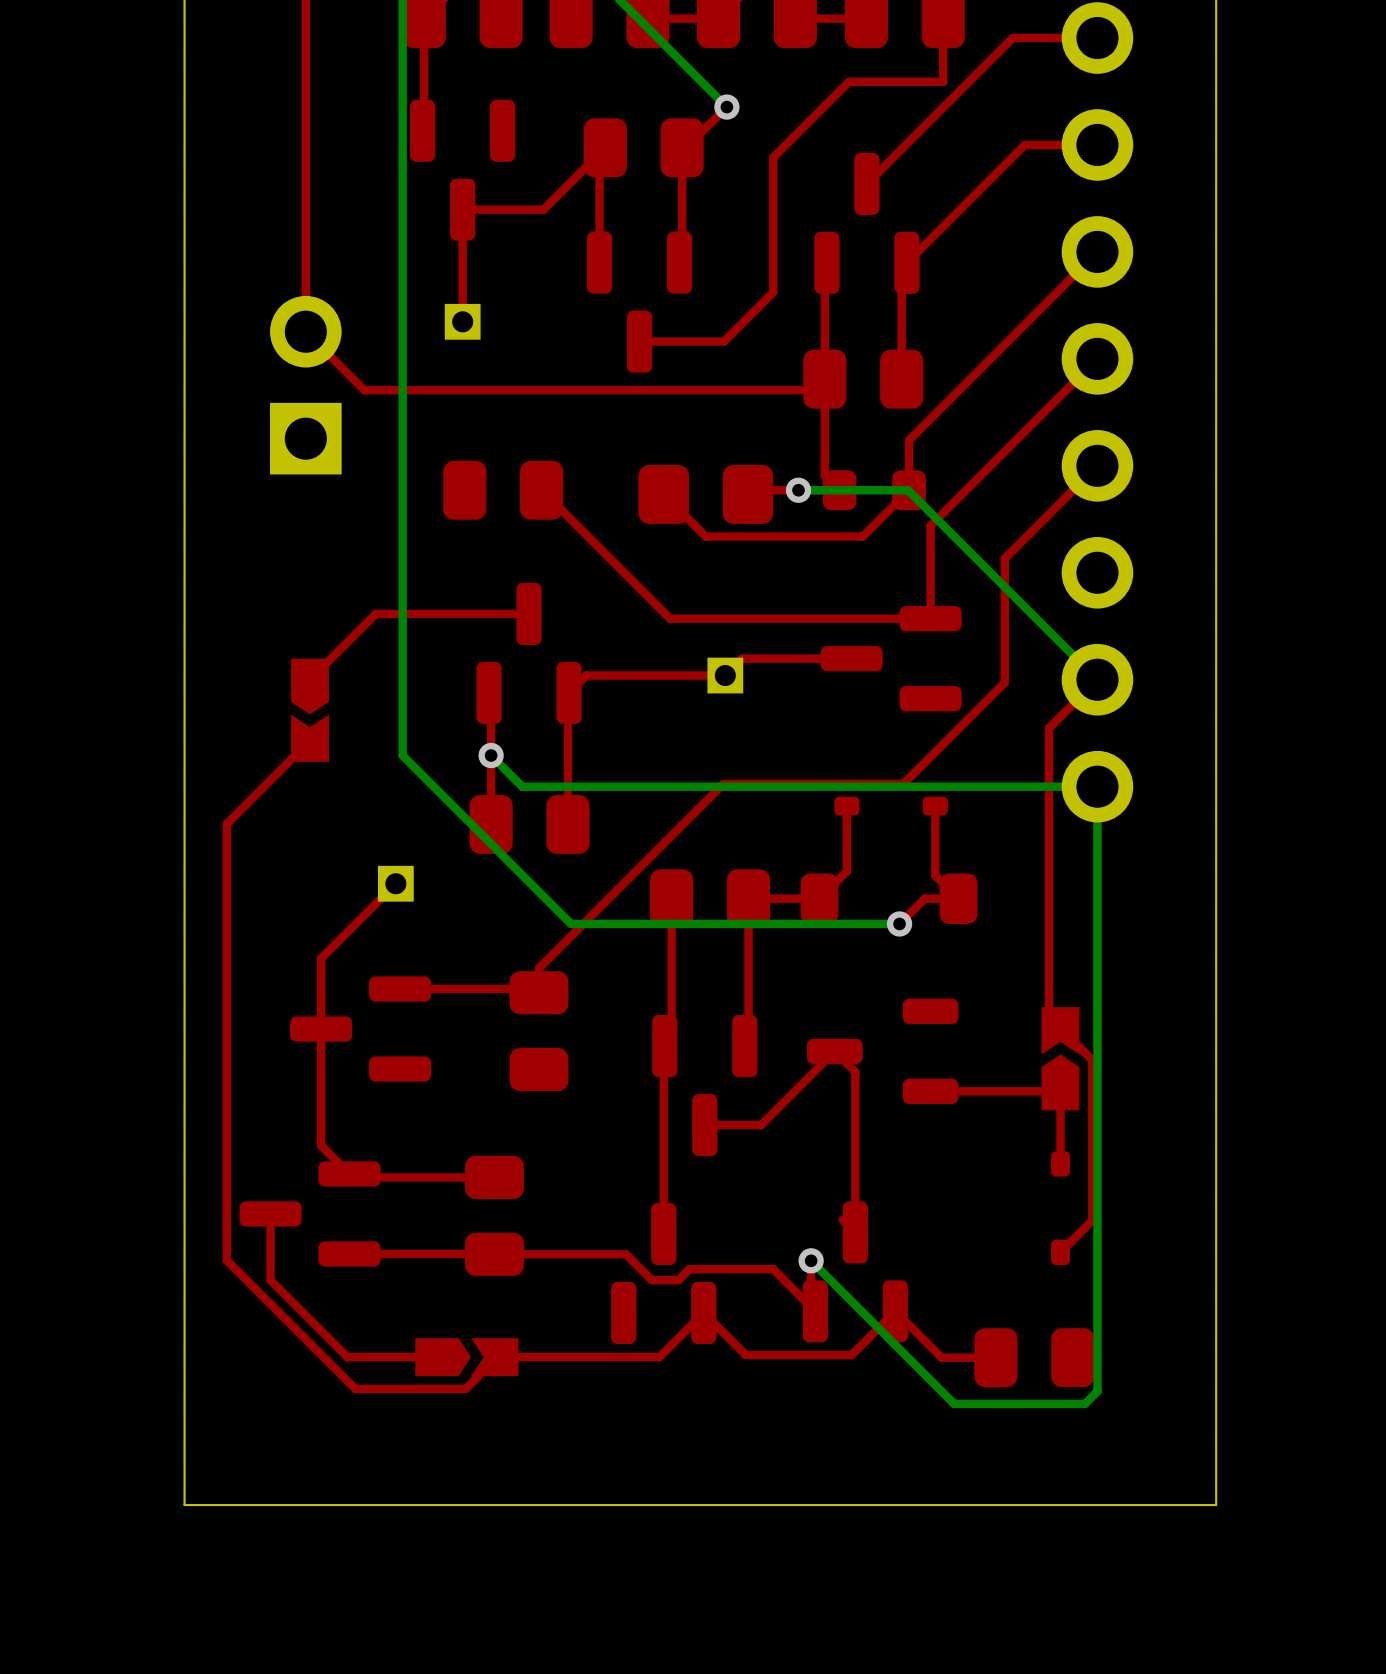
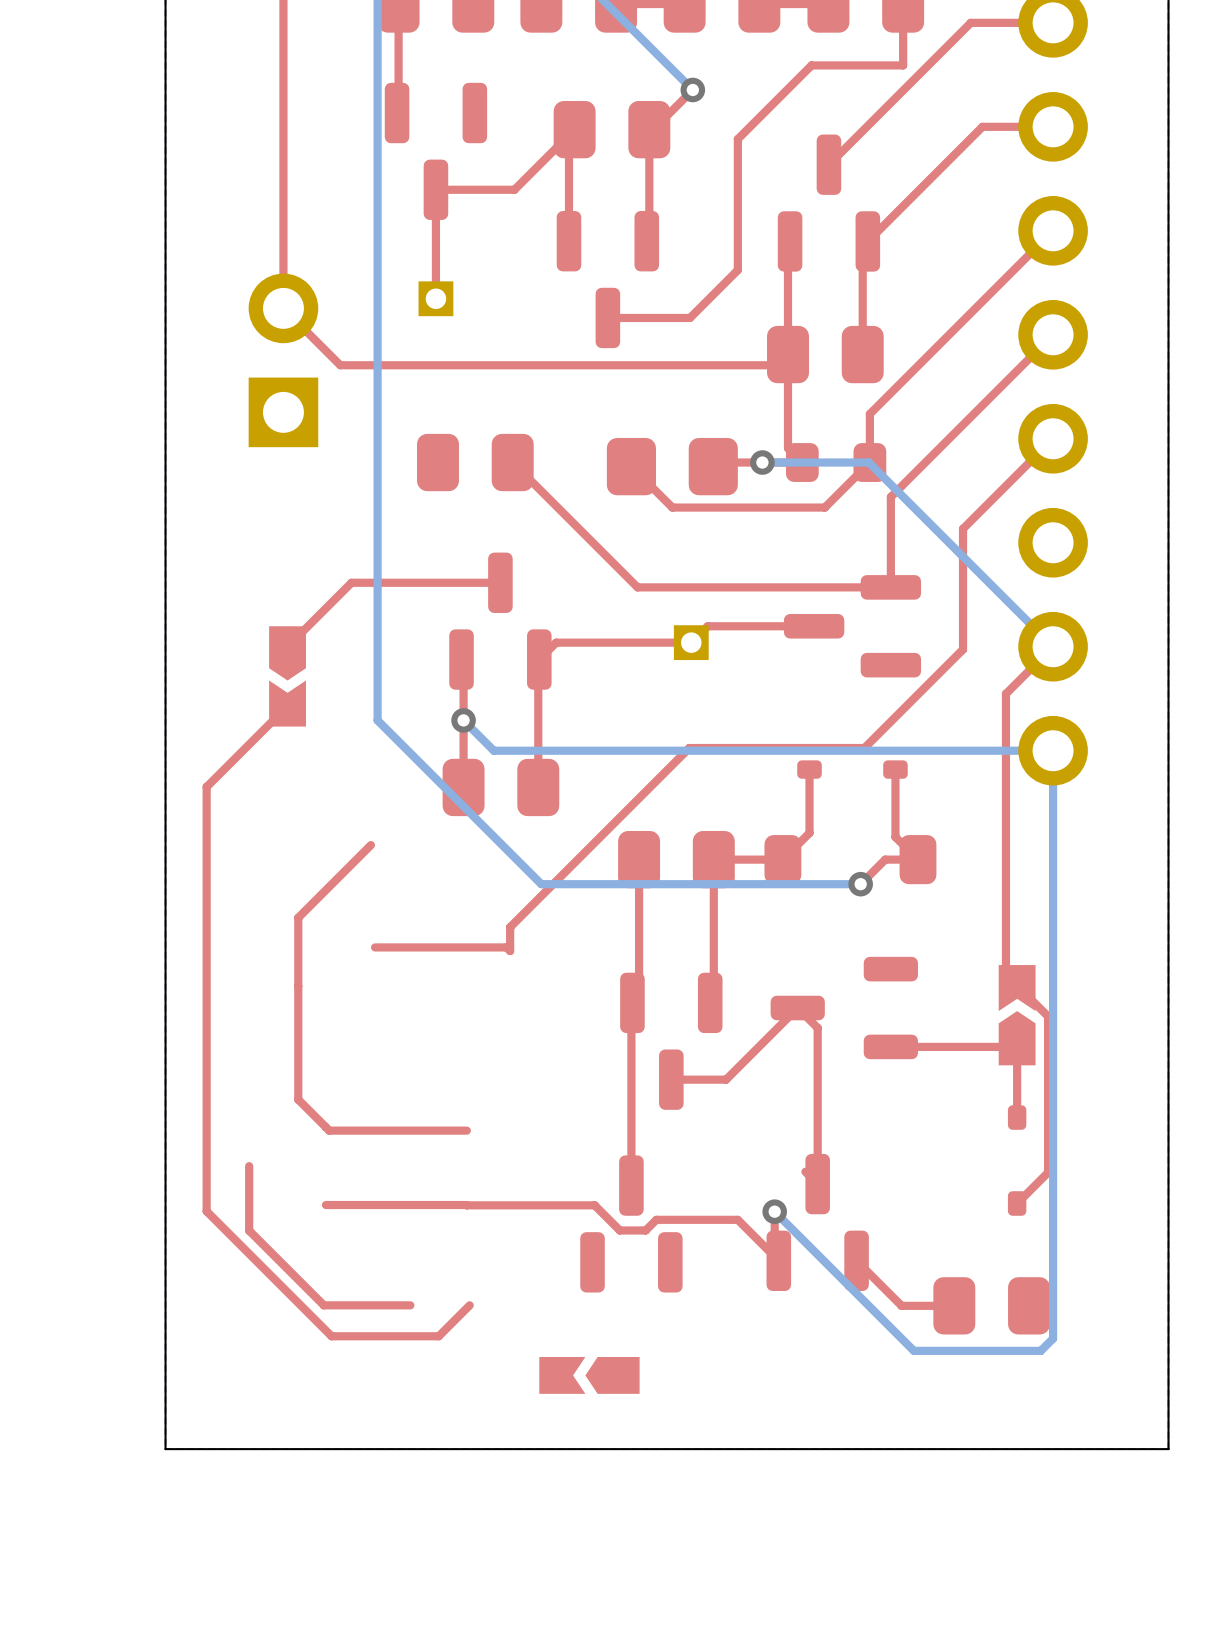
part: (395, 883) -> none
part: (360, 1029) -> none
part: (539, 1031) -> none
part: (310, 1213) -> none
part: (494, 1215) -> none
top track: (895, 1311) (851, 1355) (745, 1355) (703, 1312) (659, 1357) (497, 1357) -> none
part rotation: 0° (466, 1357) -> 180° (589, 1375)
part position: (466, 1357) -> (589, 1375)

